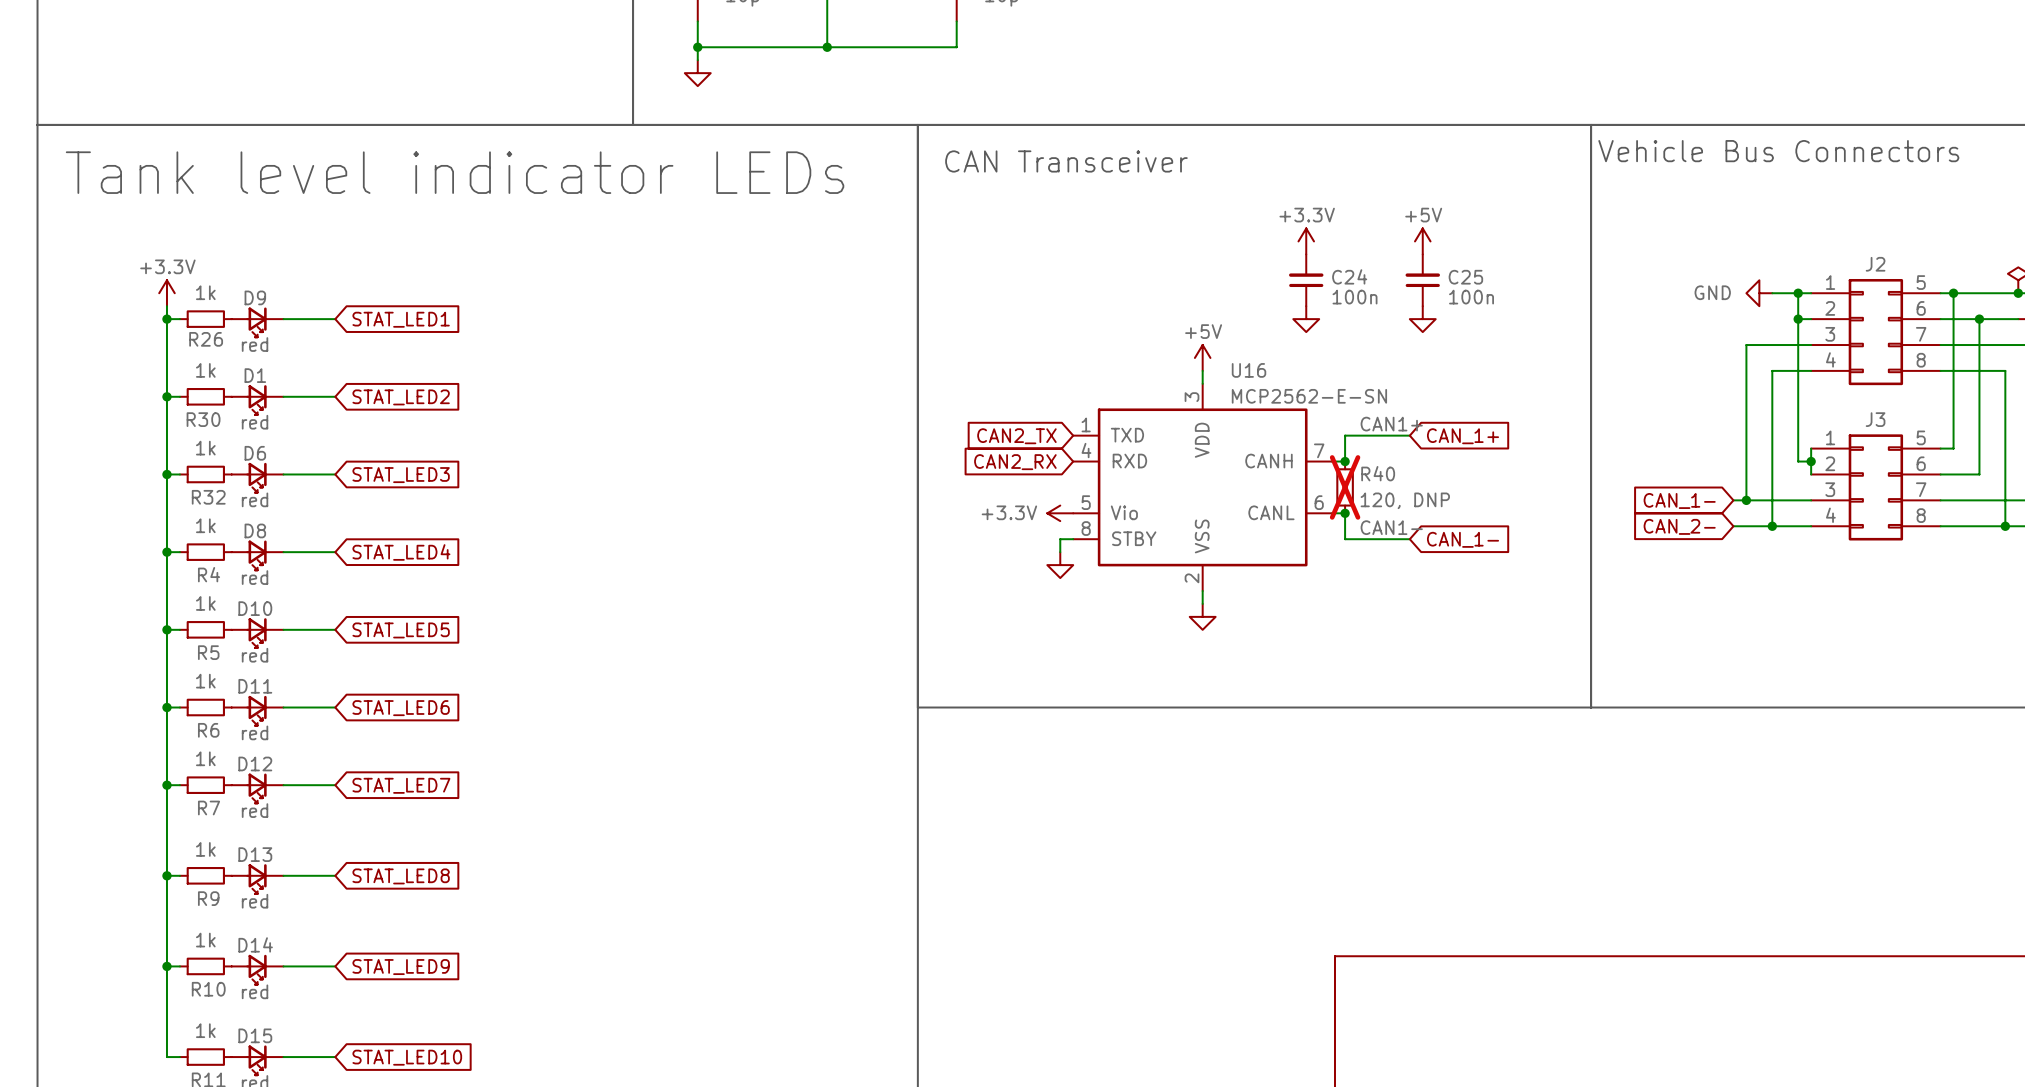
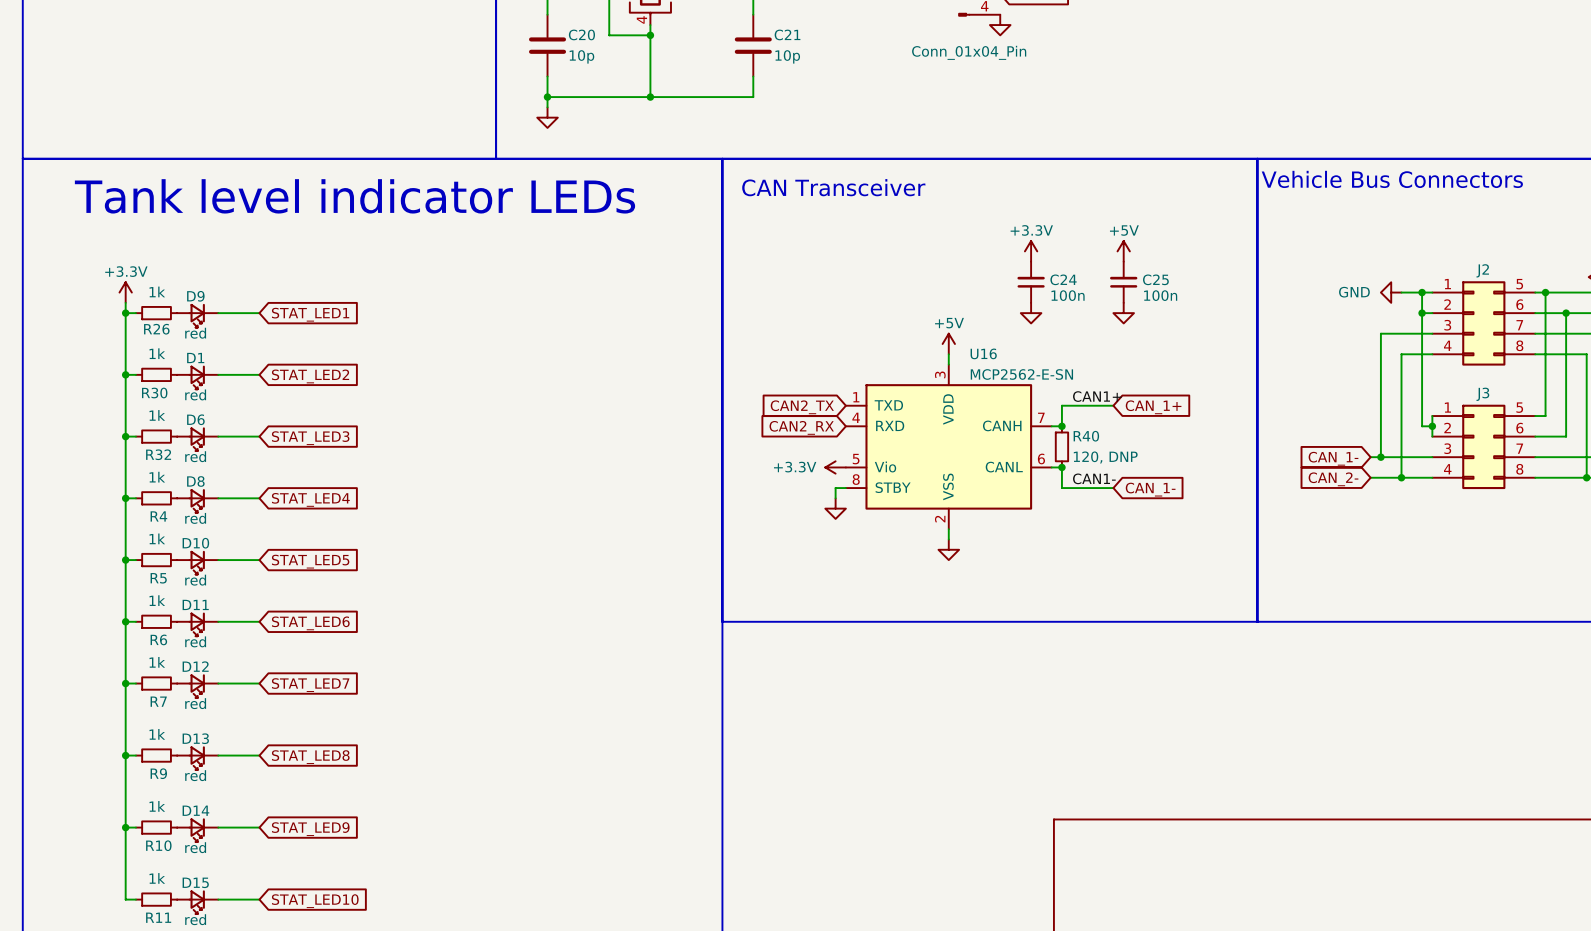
R40 do-not-place cross: (1345, 487) -> none

